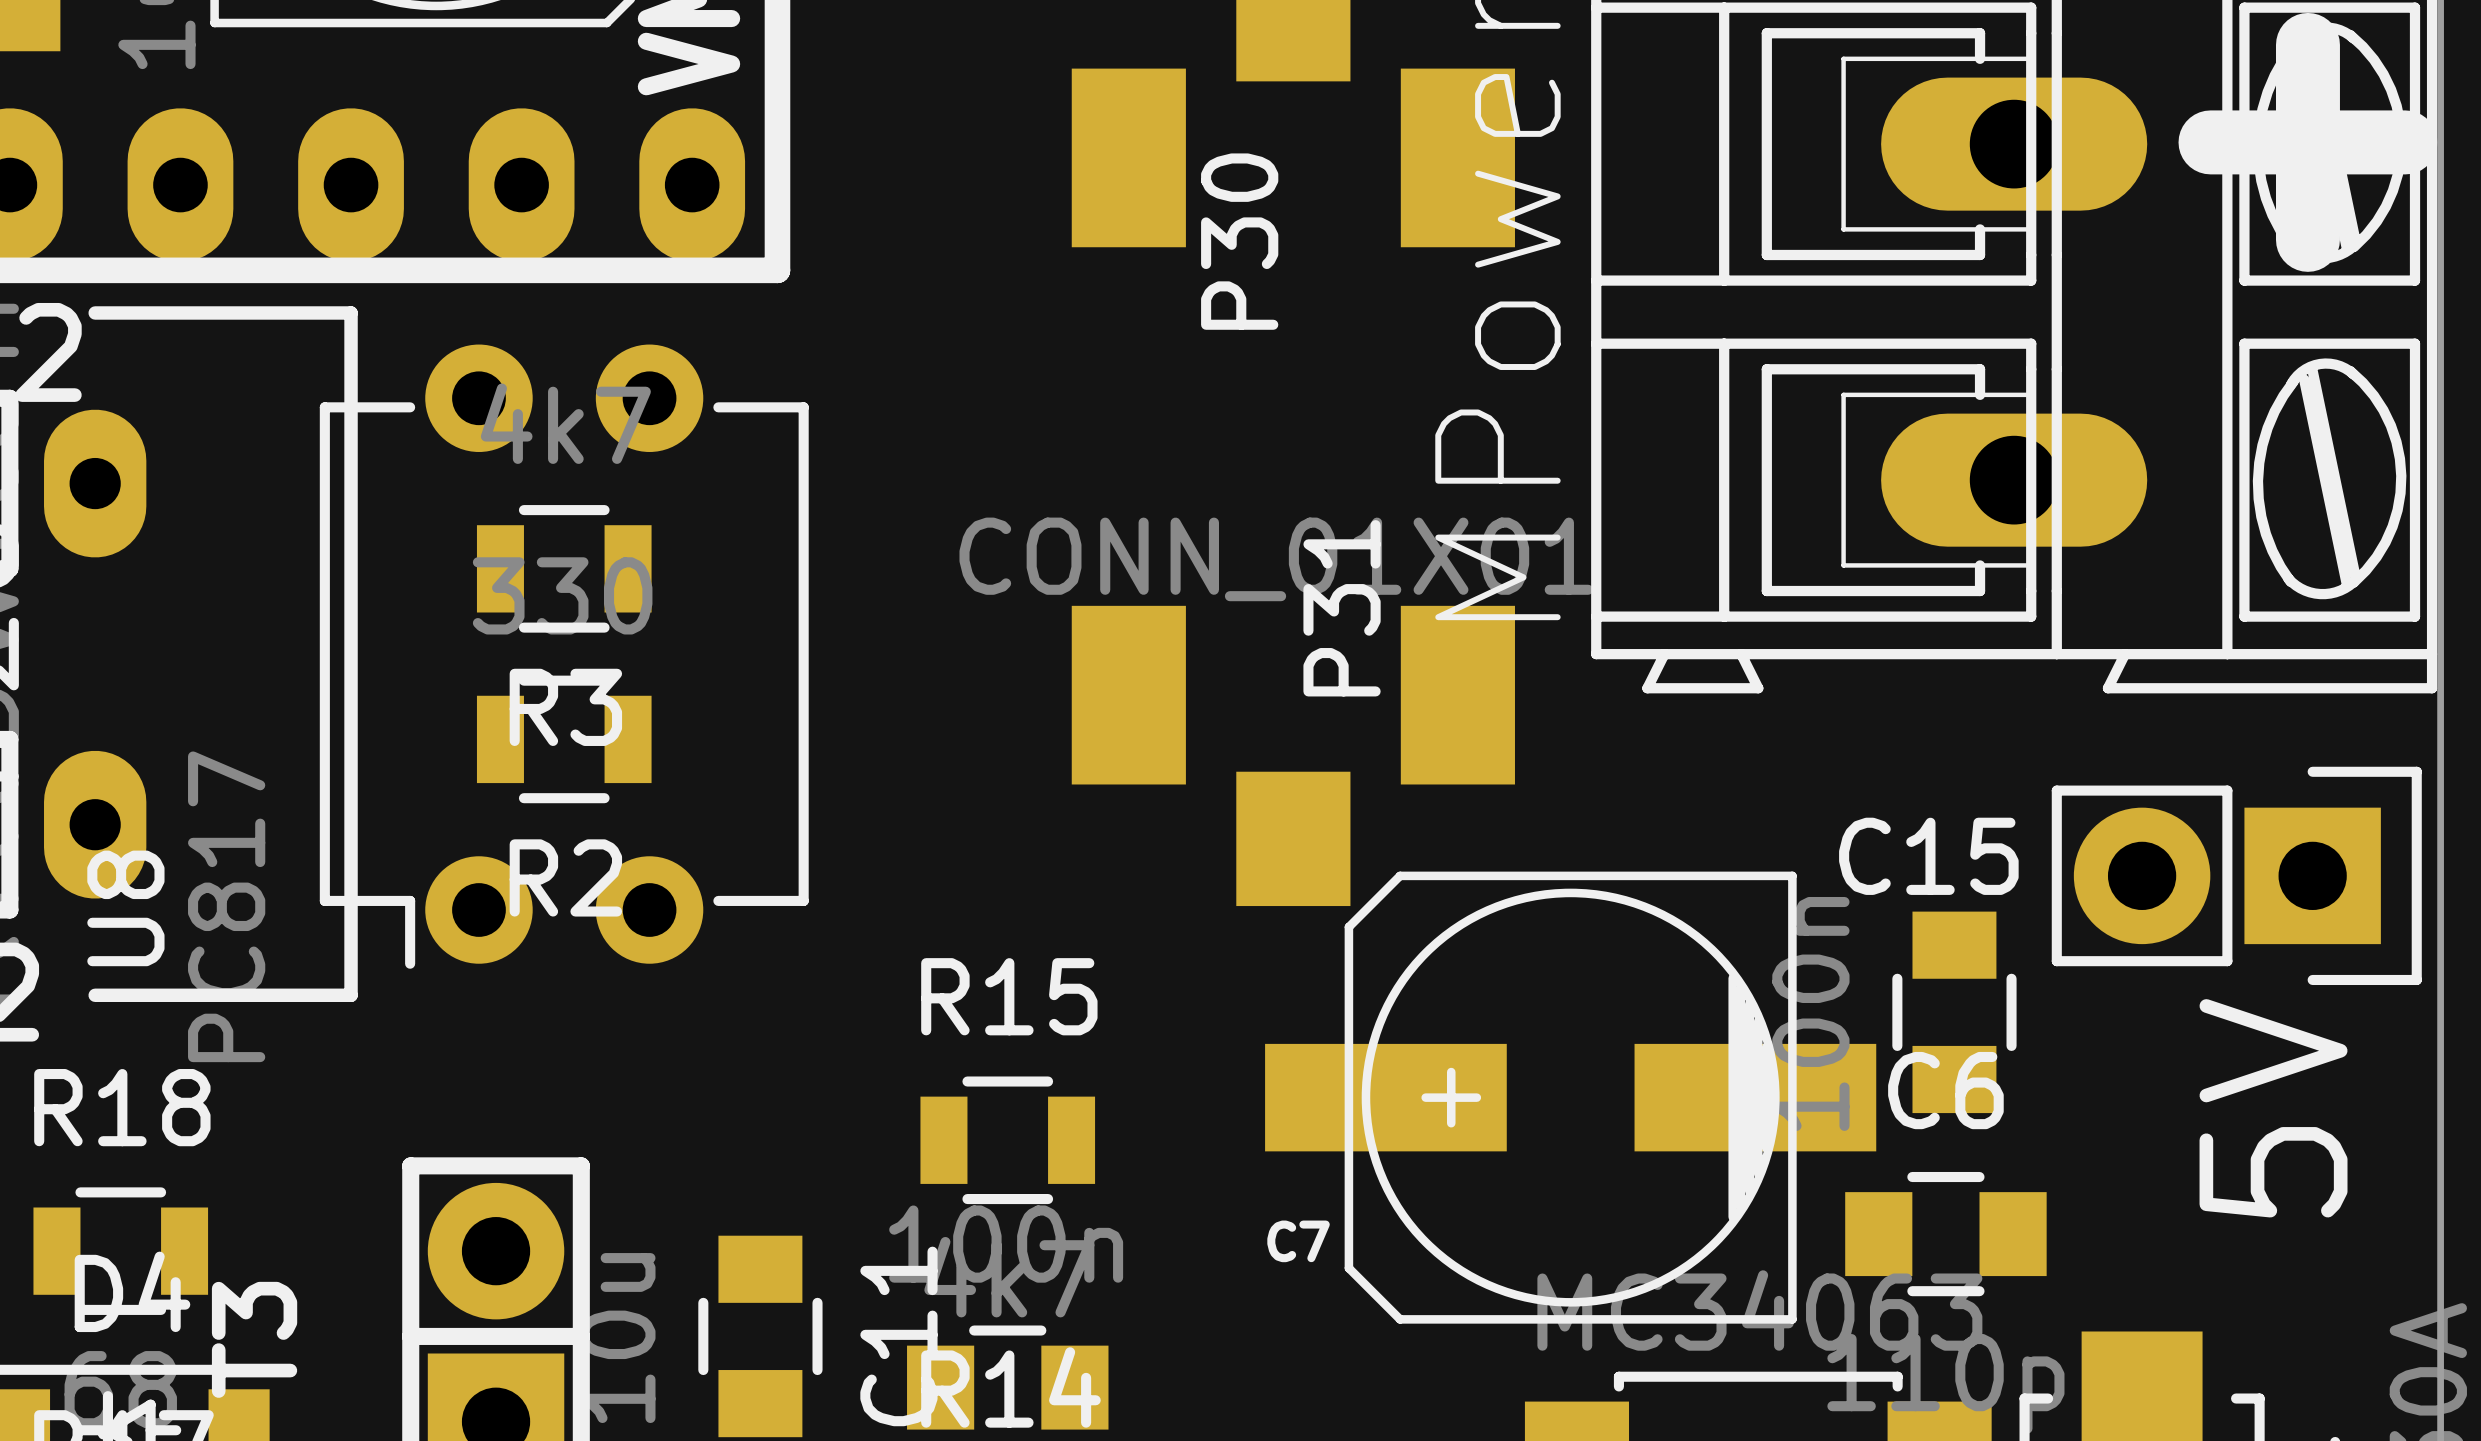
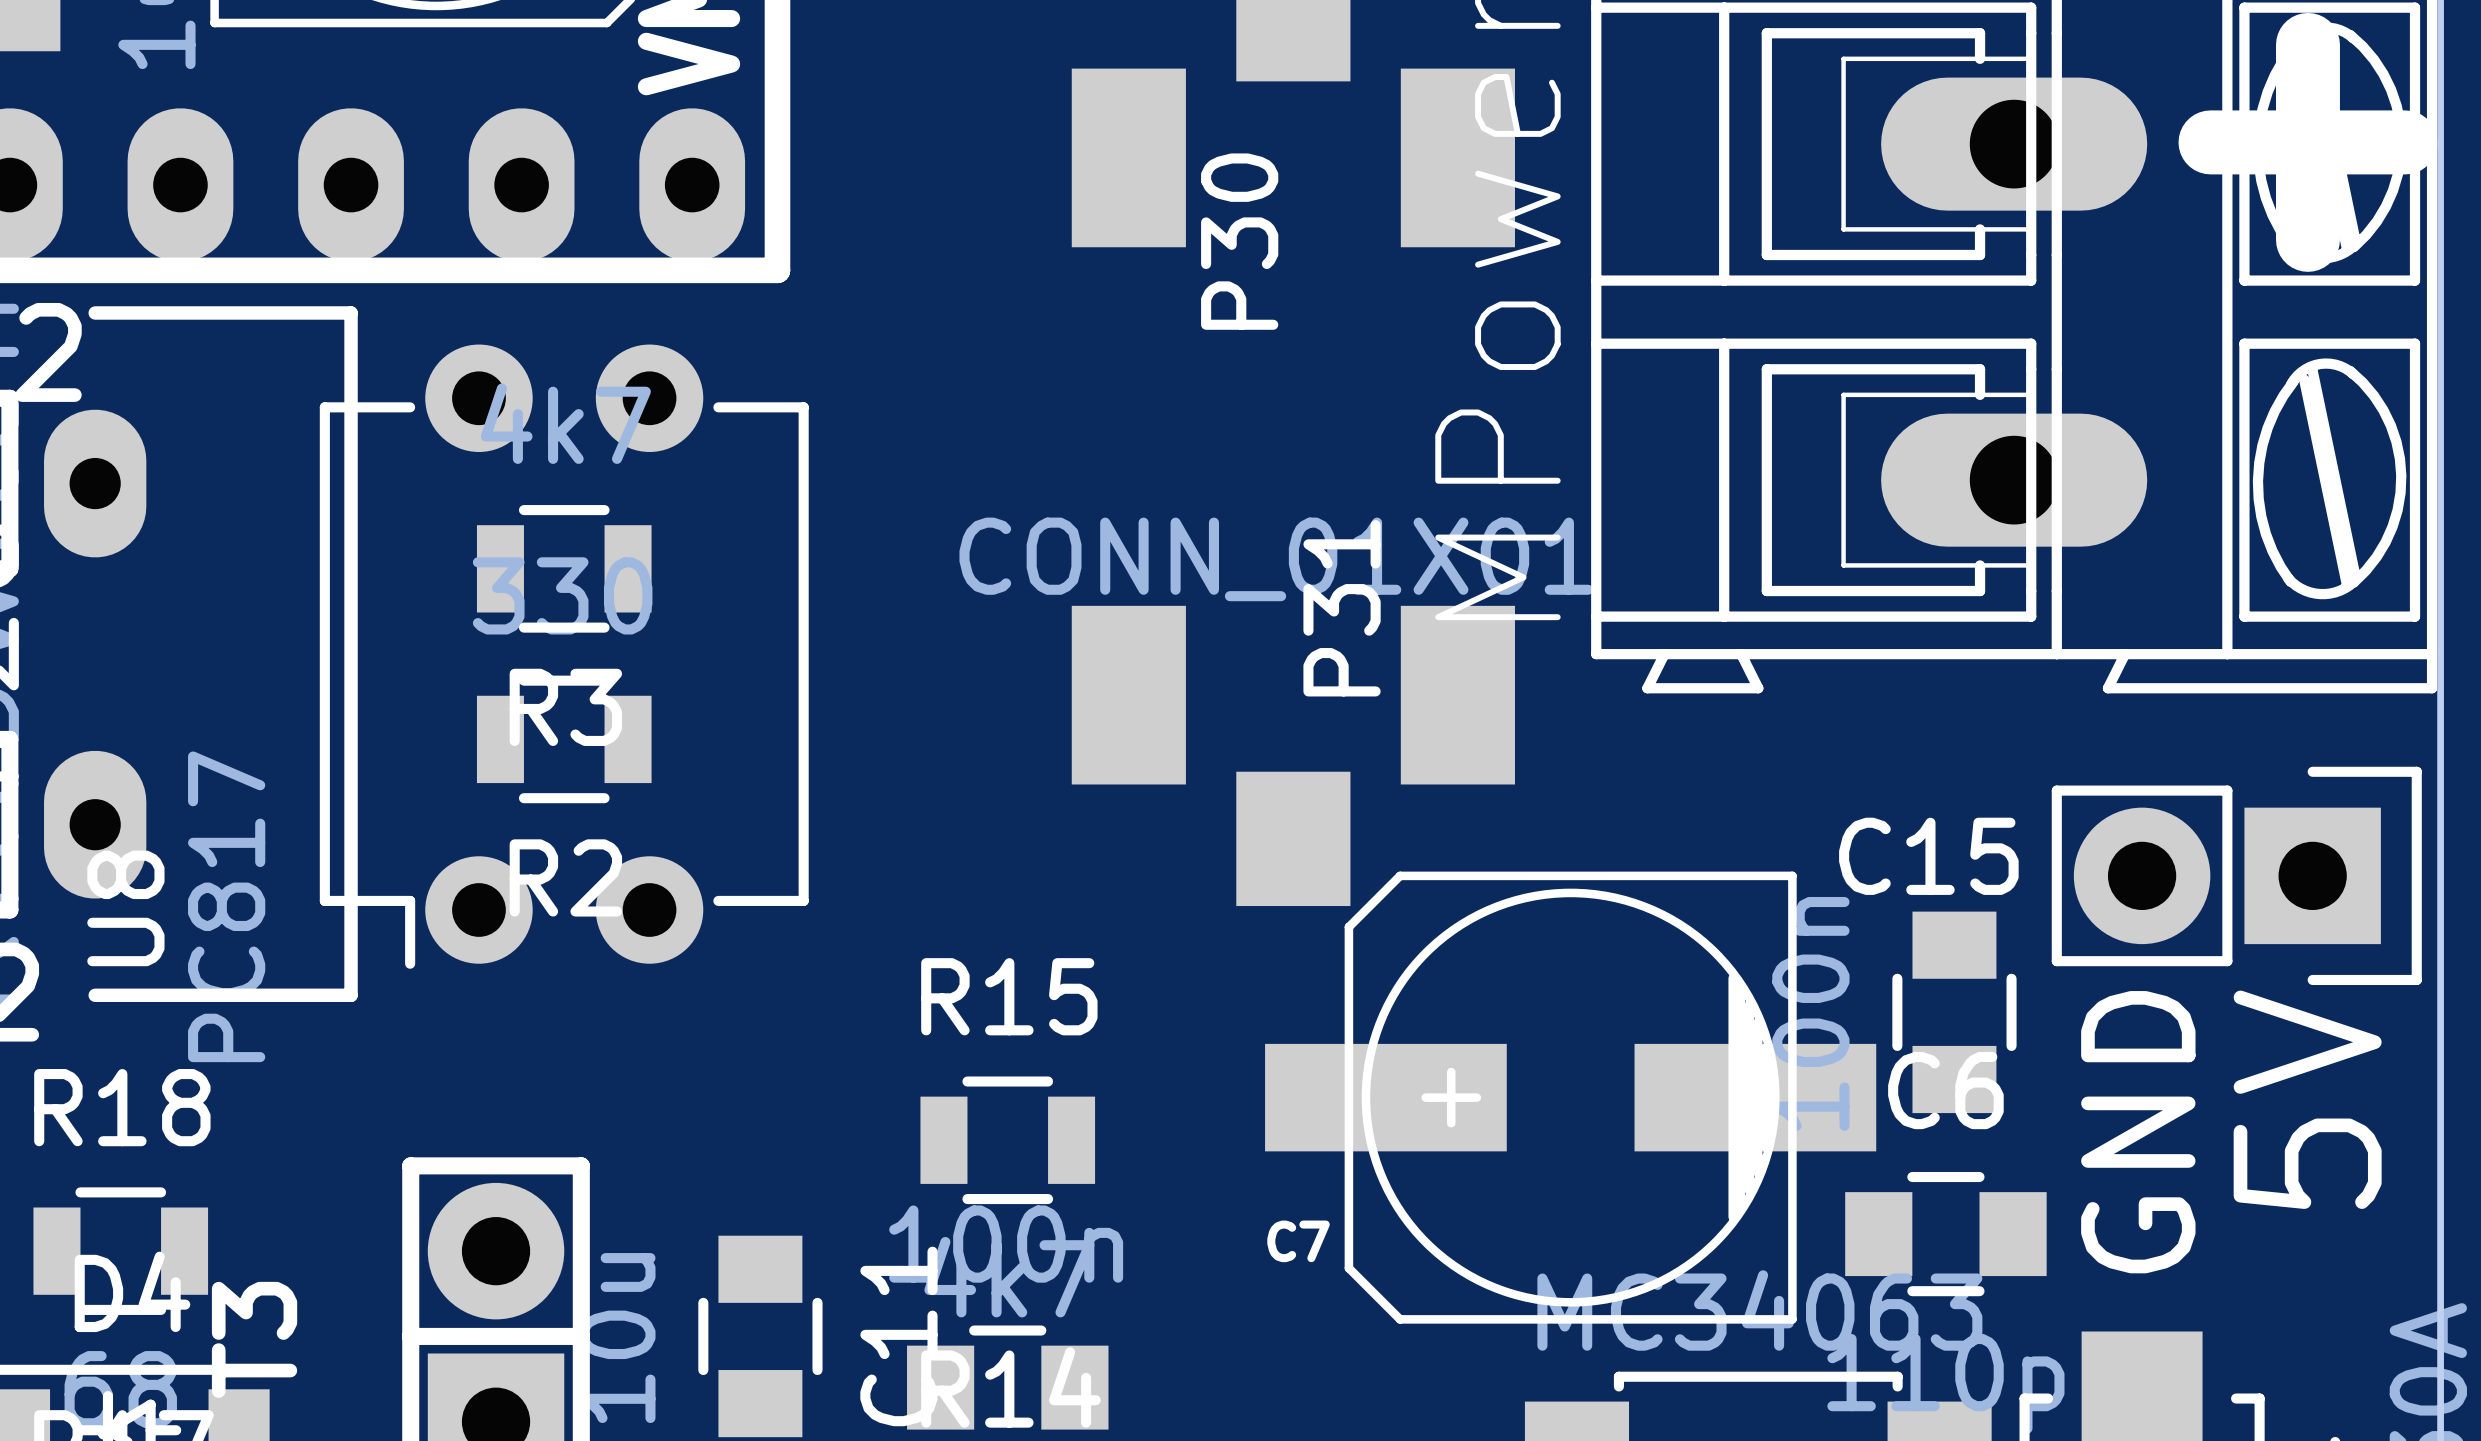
text position: 5V (2273, 1108) -> 5V (2307, 1099)
text: none -> GND (2138, 1132)

